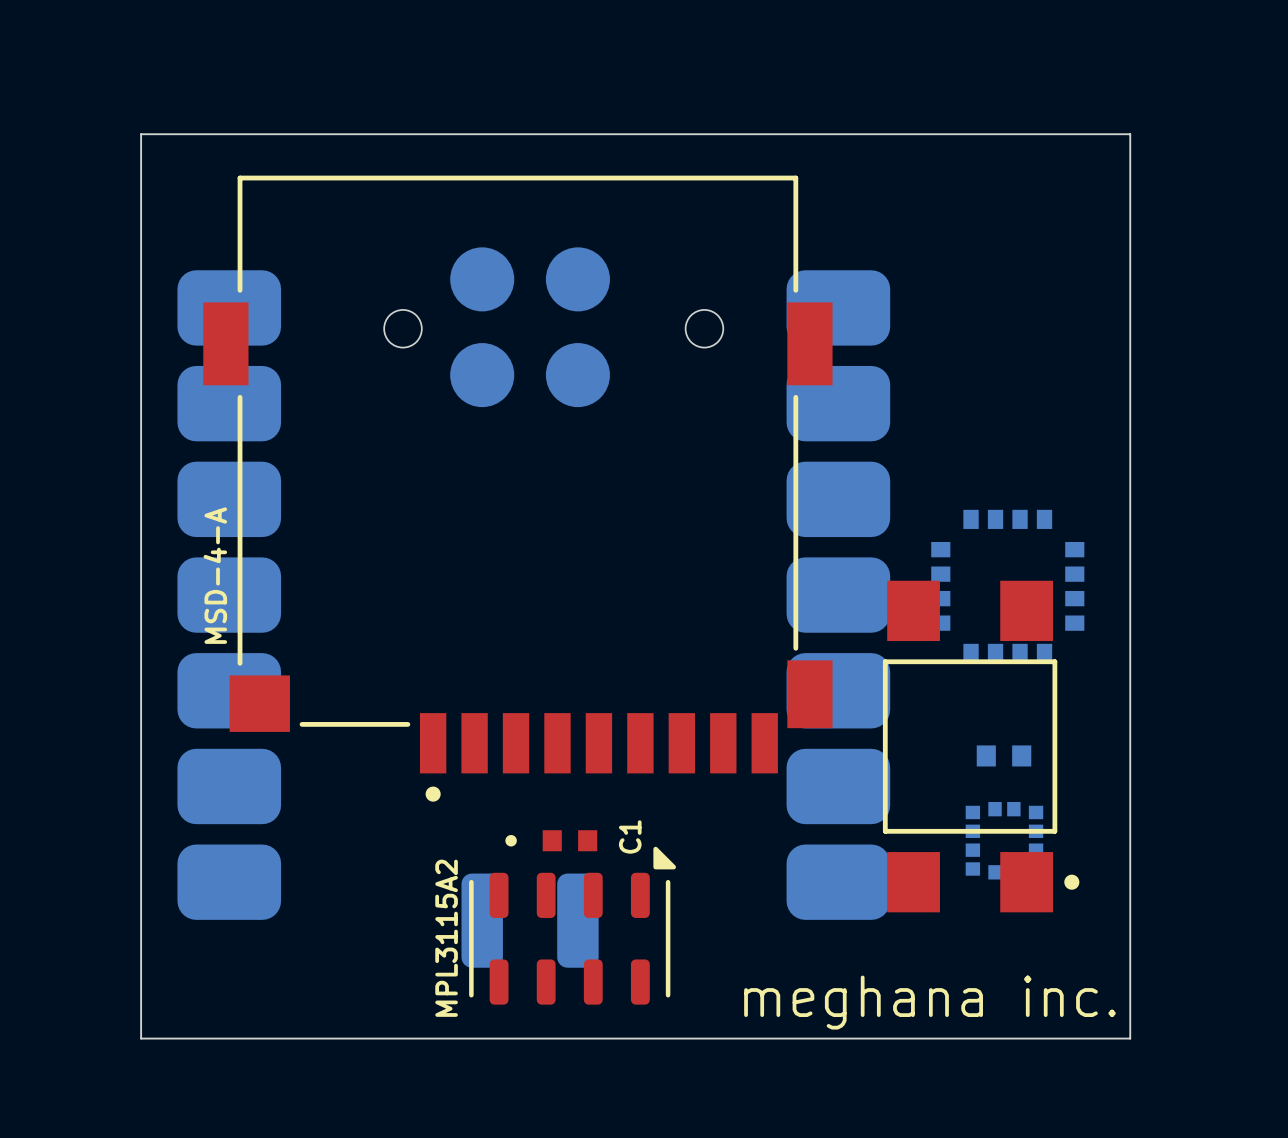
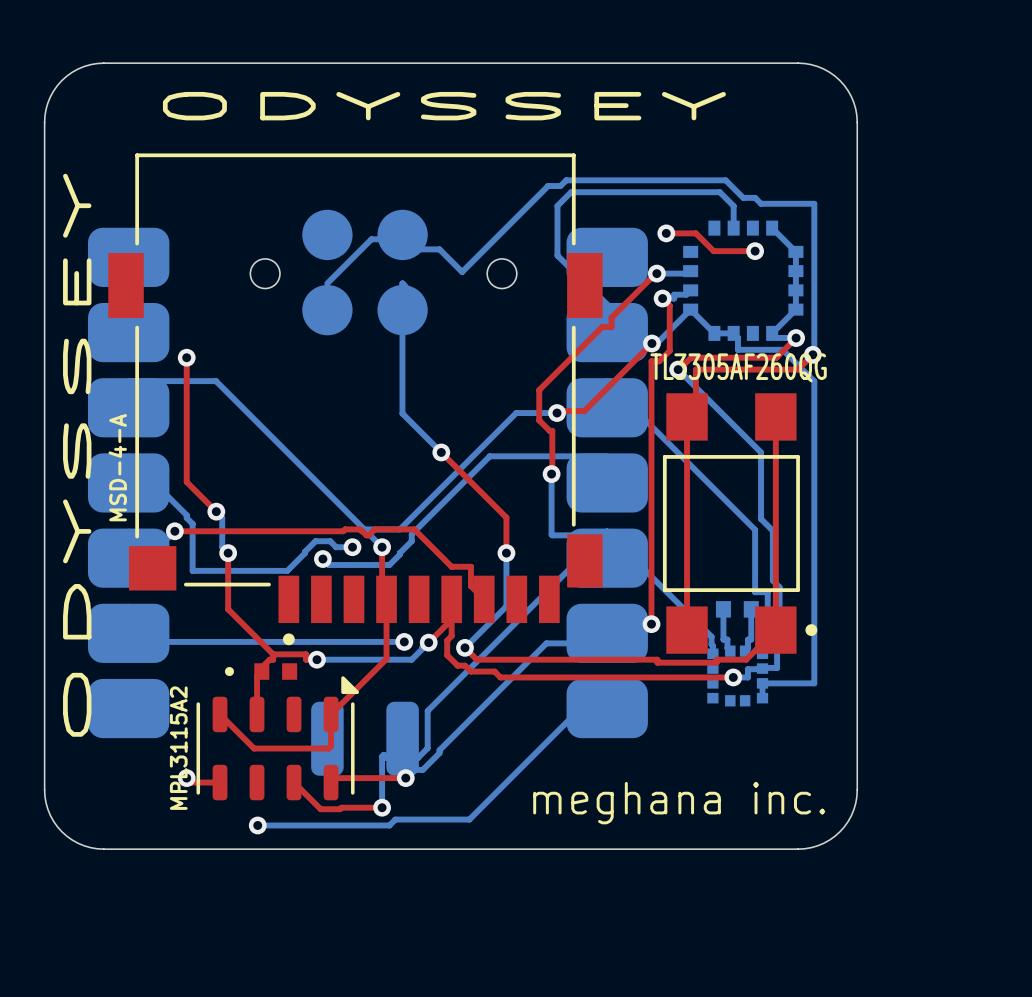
text: none -> ODYSSEY (444, 106)
board edge: (141, 134) (1130, 134) (1130, 1038) (141, 1038) (141, 134) -> (103, 63) (84, 66) (61, 80) (50, 96) (44, 122) (44, 789) (50, 815) (61, 831) (78, 843) (103, 849) (798, 849) (817, 845) (839, 831) (851, 815) (857, 789) (857, 122) (853, 102) (839, 80) (823, 69) (798, 63) (103, 63)
bottom track: none -> (733, 228) (733, 206) (719, 192) (571, 192) (557, 205) (557, 255) (607, 305)
bottom track: none -> (772, 228) (795, 251) (795, 309) (772, 333) (776, 337) (787, 337)
top track: none -> (666, 233) (695, 233) (713, 251) (755, 251)
via: none -> (666, 233)
via: none -> (755, 251)
bottom track: none -> (690, 271) (688, 273) (656, 273)
top track: none -> (656, 273) (611, 317) (611, 327) (602, 327) (539, 390) (539, 420) (549, 430) (552, 430) (551, 474)
via: none -> (656, 273)
bottom track: none -> (327, 283) (371, 239) (385, 239) (395, 249) (439, 249) (462, 271) (548, 186) (560, 186) (566, 180) (725, 180) (743, 197) (755, 197) (761, 203) (814, 203) (812, 354)
bottom track: none -> (405, 286) (402, 283) (402, 413) (441, 452)
bottom track: none -> (690, 290) (686, 294) (674, 294) (674, 298) (662, 298)
top track: none -> (662, 298) (669, 305) (669, 350) (659, 361) (651, 361) (651, 624)
via: none -> (662, 298)
top track: none -> (796, 338) (776, 357) (690, 357) (684, 364) (684, 369) (678, 369)
via: none -> (796, 338)
bottom track: none -> (651, 343) (656, 343) (690, 309) (714, 333) (733, 333) (737, 337) (737, 349) (782, 349) (814, 381) (814, 683) (762, 683) (762, 698)
top track: none -> (651, 343) (584, 411) (559, 411) (557, 413)
via: none -> (651, 343)
top track: none -> (812, 354) (798, 369) (695, 369) (695, 408) (687, 416) (687, 630)
via: none -> (812, 354)
top track: none -> (186, 357) (186, 482) (216, 511)
via: none -> (186, 357)
text: none -> TL3305AF260QG (738, 367)
bottom track: none -> (678, 369) (761, 452) (761, 519) (772, 530) (772, 580) (779, 587) (779, 631) (775, 636) (775, 639) (777, 639) (777, 667) (747, 669) (747, 677) (733, 677)
via: none -> (678, 369)
bottom track: none -> (128, 381) (216, 381) (382, 547)
bottom track: none -> (607, 381) (607, 393) (631, 417) (643, 417) (755, 529) (755, 592) (767, 592) (767, 626) (763, 626) (763, 644) (759, 647) (762, 653)
bottom track: none -> (557, 413) (516, 413) (399, 529) (364, 529)
via: none -> (557, 413)
top track: none -> (775, 416) (775, 630) (746, 659) (716, 659) (716, 662) (657, 662) (657, 659) (476, 659) (465, 647)
top track: none -> (441, 452) (506, 517) (506, 553)
via: none -> (441, 452)
text: none -> ODYSSEY (77, 455)
bottom track: none -> (128, 456) (128, 459) (186, 515) (186, 517) (192, 523) (192, 570) (287, 570) (315, 541) (330, 541) (336, 547) (352, 547)
bottom track: none -> (607, 456) (489, 456) (411, 534) (411, 541) (389, 564) (328, 564) (322, 559)
bottom track: none -> (551, 474) (551, 534) (603, 535)
via: none -> (551, 474)
part position: (1007, 586) -> (743, 280)
bottom track: none -> (216, 511) (222, 517) (222, 547) (228, 553)
via: none -> (216, 511)
top track: none -> (174, 531) (343, 531) (345, 529) (359, 529) (368, 535) (374, 529) (414, 529) (451, 566) (470, 566) (470, 586) (484, 599)
via: none -> (174, 531)
via: none -> (352, 547)
top track: none -> (382, 547) (382, 594) (386, 599) (386, 658) (331, 714) (331, 746) (328, 748) (254, 748) (220, 714)
via: none -> (382, 547)
top track: none -> (228, 553) (228, 609) (273, 654)
via: none -> (228, 553)
bottom track: none -> (506, 553) (506, 606) (465, 647)
via: none -> (506, 553)
via: none -> (322, 559)
top track: none -> (451, 593) (451, 636) (447, 640) (447, 655) (457, 665) (465, 665) (470, 671) (494, 671) (500, 677) (733, 677)
part position: (981, 746) -> (740, 523)
bottom track: none -> (128, 606) (163, 641) (404, 641)
bottom track: none -> (723, 609) (723, 639) (727, 639) (727, 648) (730, 651)
bottom track: none -> (751, 609) (751, 639) (747, 639) (747, 648) (745, 651)
bottom track: none -> (607, 612) (576, 643) (546, 643) (439, 750) (439, 753) (422, 769) (414, 769) (405, 778)
top track: none -> (451, 619) (428, 642)
via: none -> (651, 624)
via: none -> (404, 641)
bottom track: none -> (428, 642) (411, 659) (316, 659)
via: none -> (428, 642)
via: none -> (465, 647)
bottom track: none -> (712, 653) (711, 636) (643, 568) (634, 568) (607, 541) (607, 531) (427, 710) (427, 748) (417, 758) (387, 758) (383, 754) (382, 756) (382, 807)
top track: none -> (273, 654) (306, 654) (306, 659) (316, 659)
top track: none -> (273, 654) (273, 659) (269, 659) (261, 667) (261, 671) (257, 676) (257, 714)
via: none -> (316, 659)
part: none -> (261, 671)
part: C1 (551, 840) -> none
via: none -> (733, 677)
bottom track: none -> (607, 681) (469, 819) (395, 819) (389, 825) (257, 825)
part position: (572, 925) -> (277, 738)
top track: none -> (186, 778) (191, 782) (220, 782)
via: none -> (186, 778)
top track: none -> (405, 778) (335, 778) (331, 782)
via: none -> (405, 778)
top track: none -> (294, 782) (320, 809) (382, 807)
via: none -> (382, 807)
via: none -> (257, 825)

